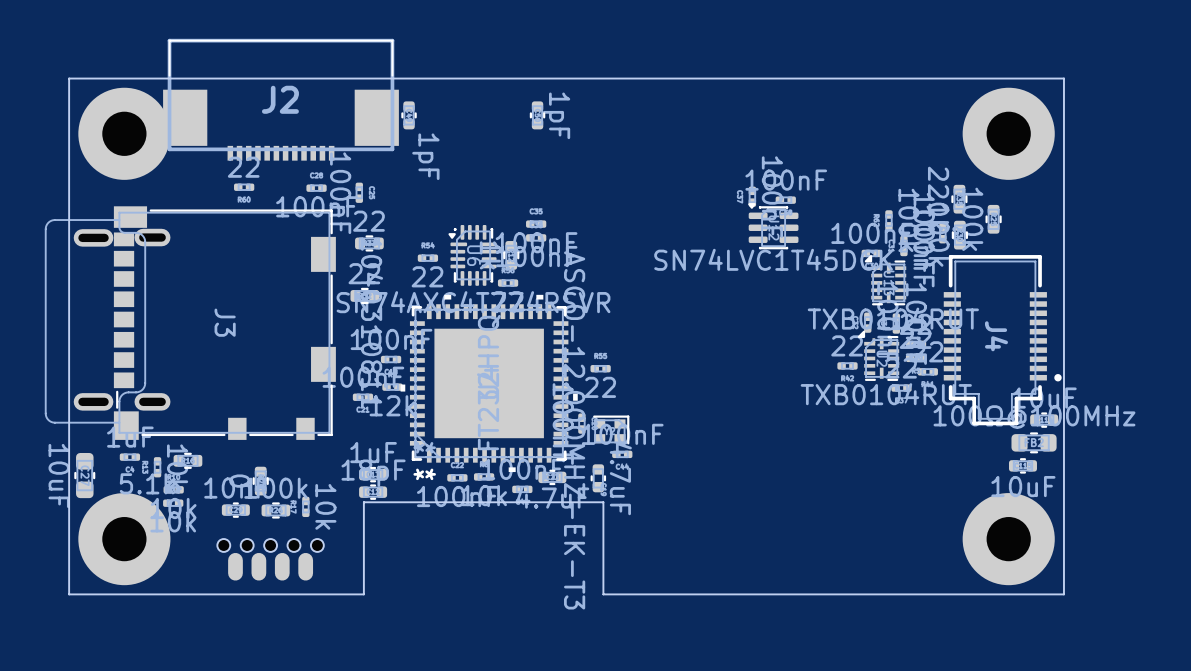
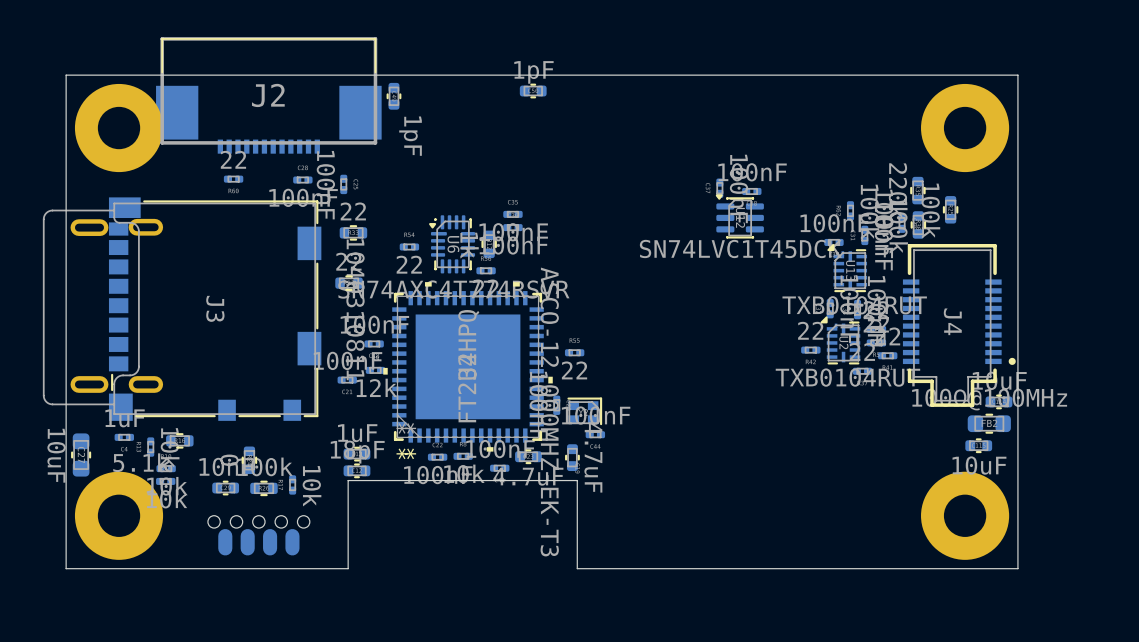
part position: (409, 115) -> (393, 96)
part rotation: 0° (537, 115) -> 90° clockwise (533, 91)
part position: (537, 115) -> (533, 91)

